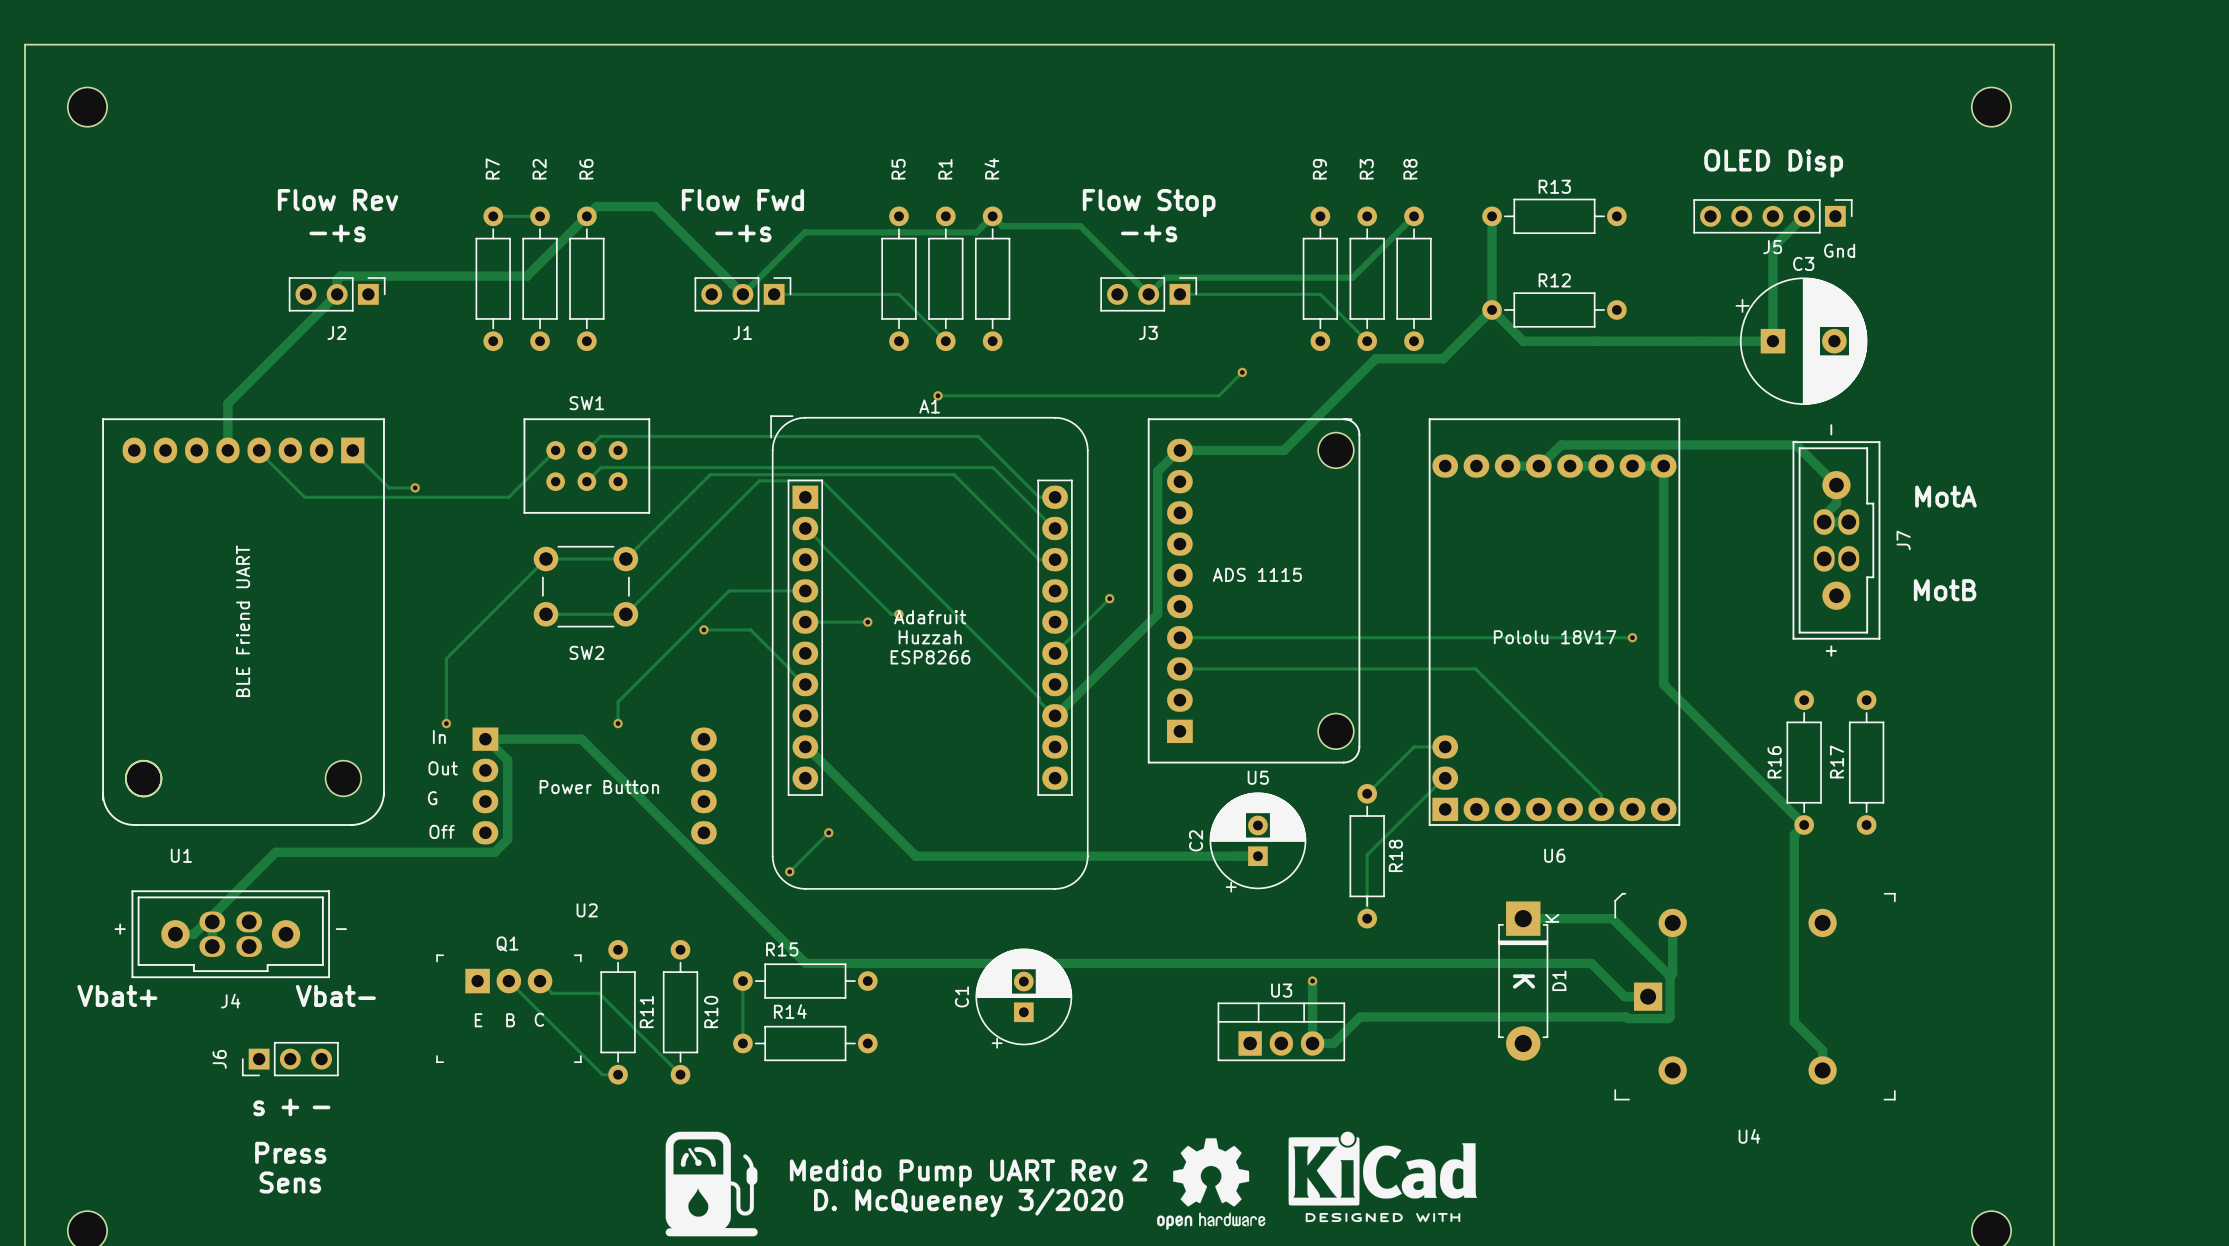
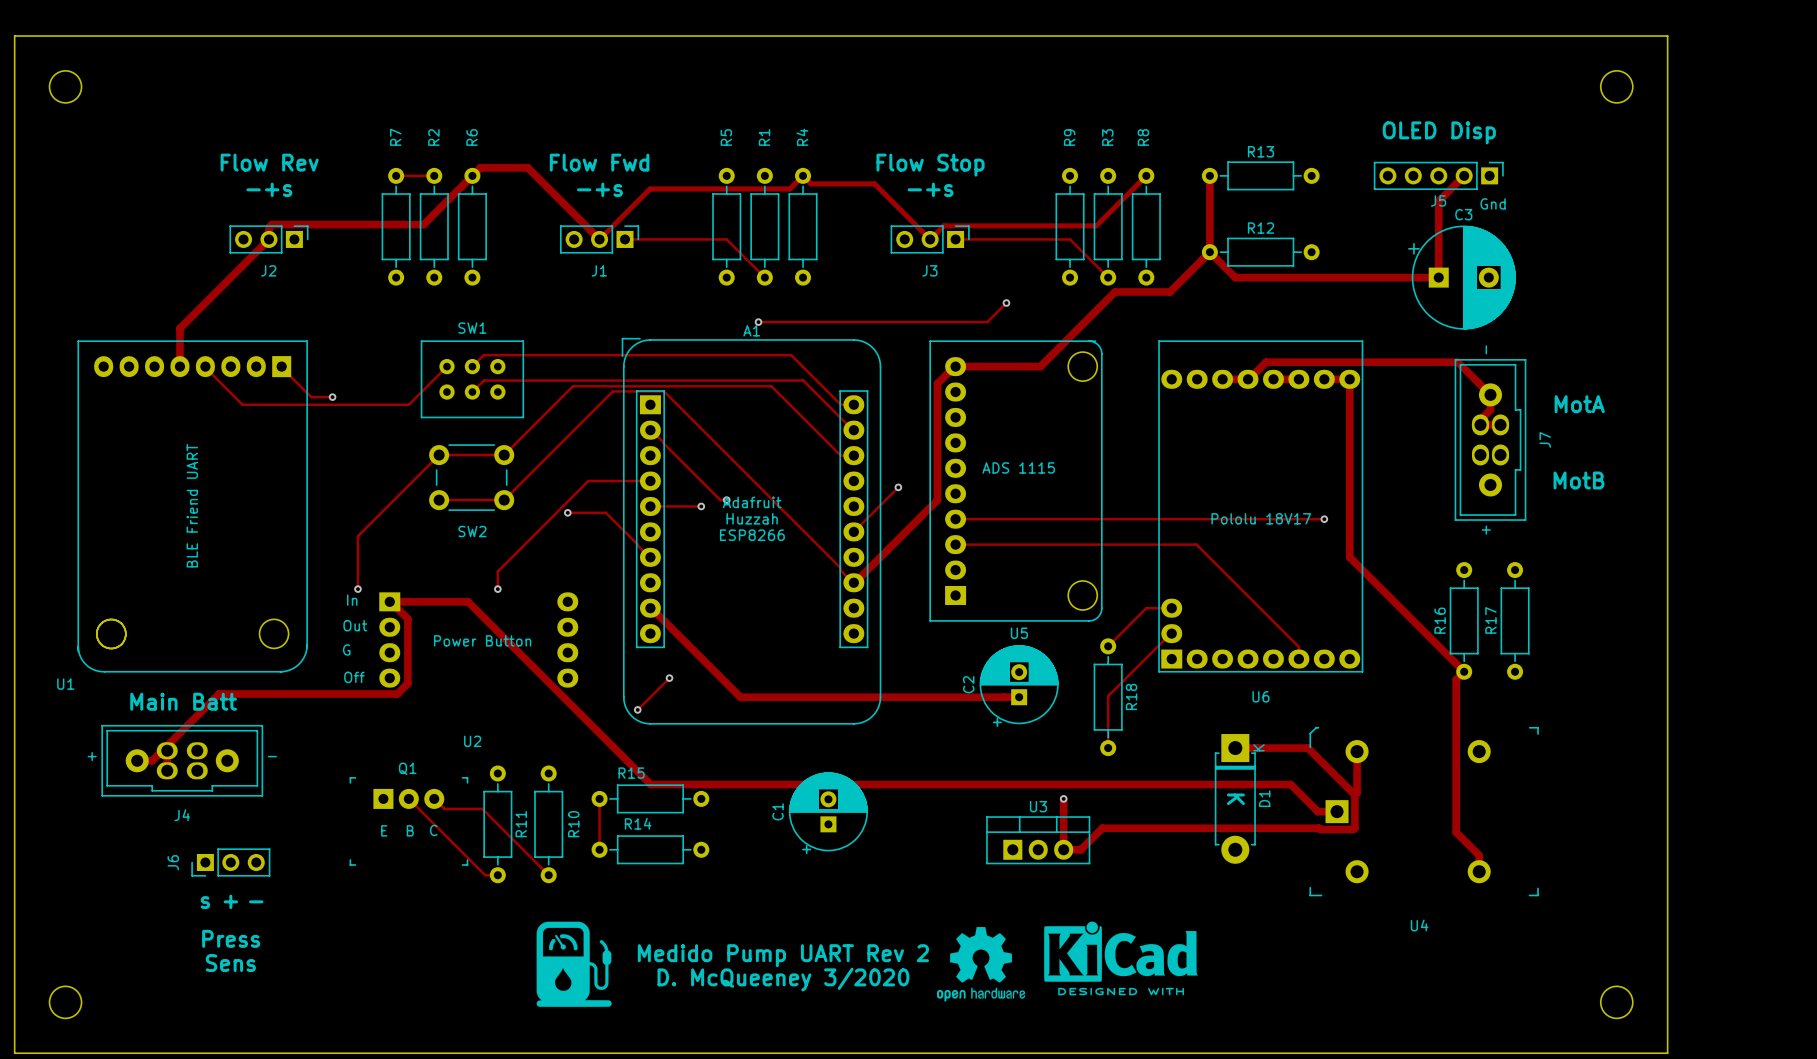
U1 name position: U1 (181, 855) -> U1 (65, 684)
text: none -> Main Batt (183, 701)
text: Vbat+ (117, 995) -> none
text: Vbat- (335, 995) -> none

